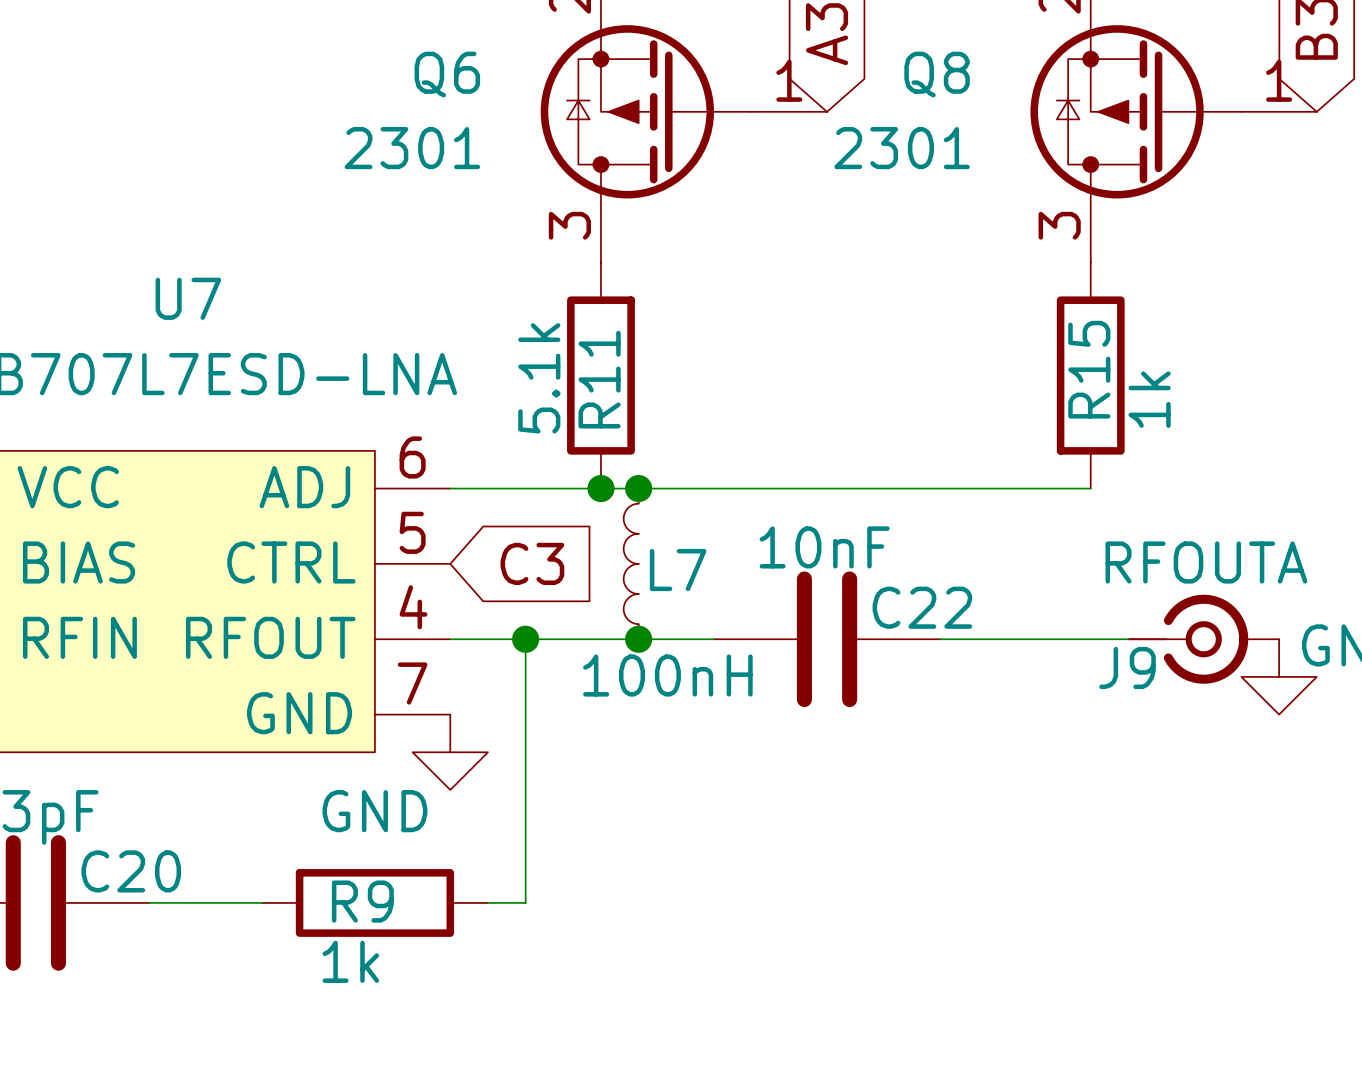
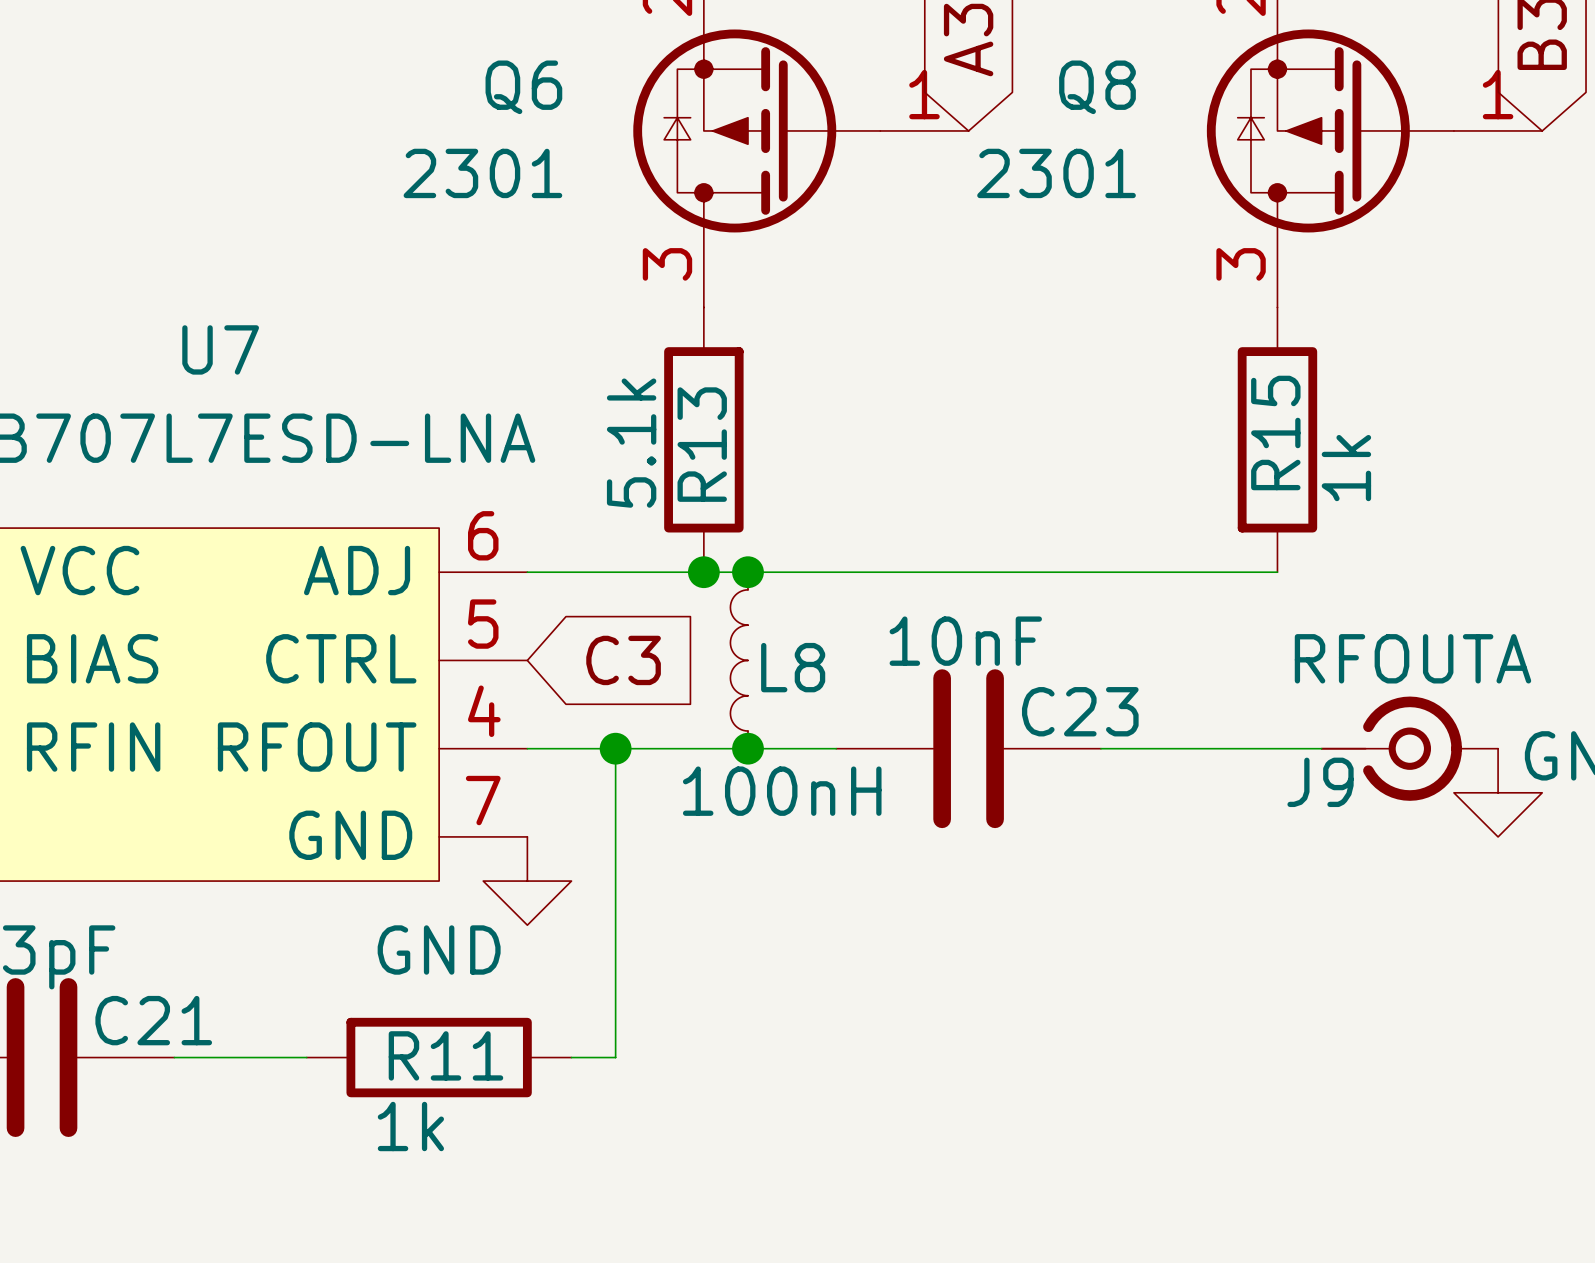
R11 name: R11 (599, 379) -> R13 (702, 444)
L7 name: L7 (678, 570) -> L8 (793, 667)
C22 name: C22 (922, 607) -> C23 (1080, 711)
C20 name: C20 (131, 871) -> C21 (153, 1020)
R9 name: R9 (362, 901) -> R11 (445, 1055)

